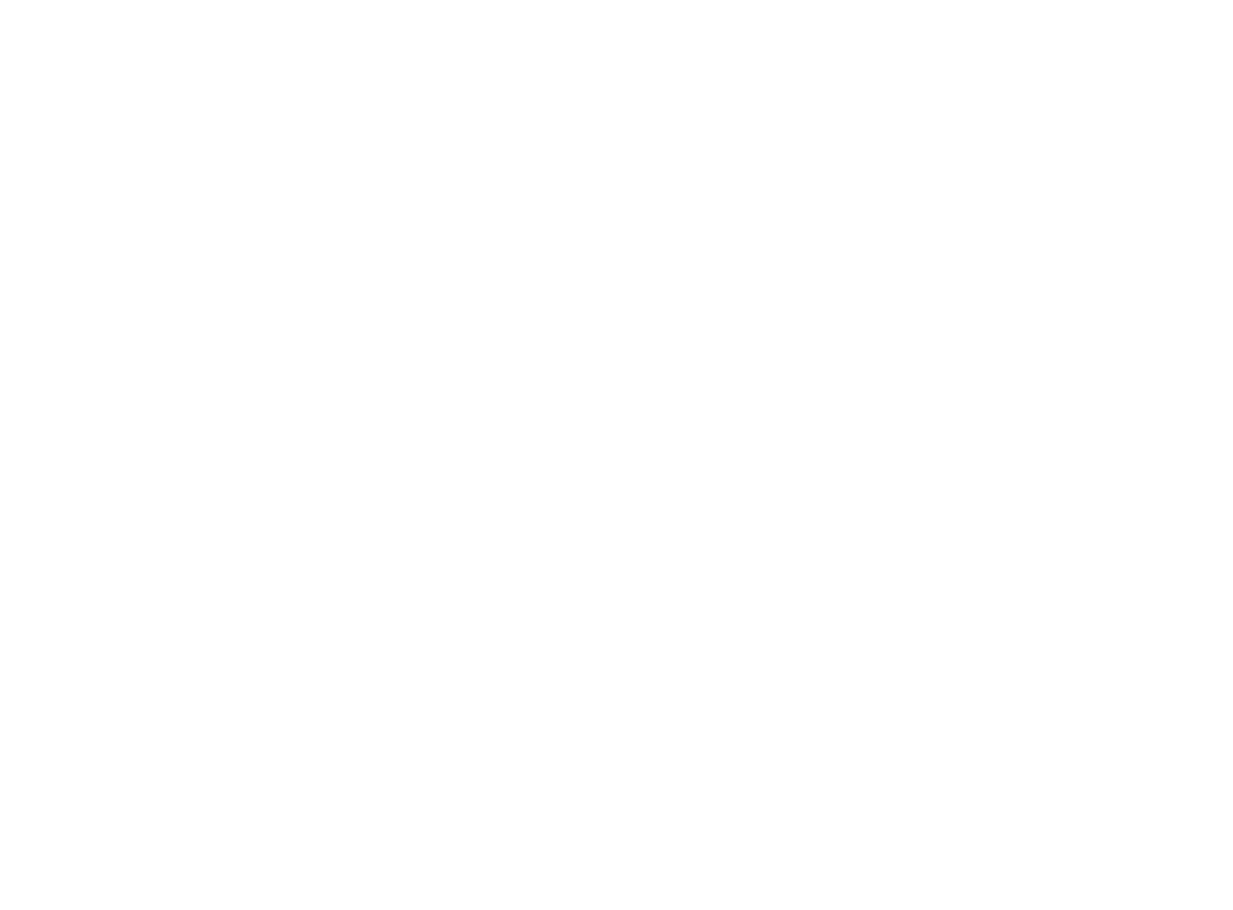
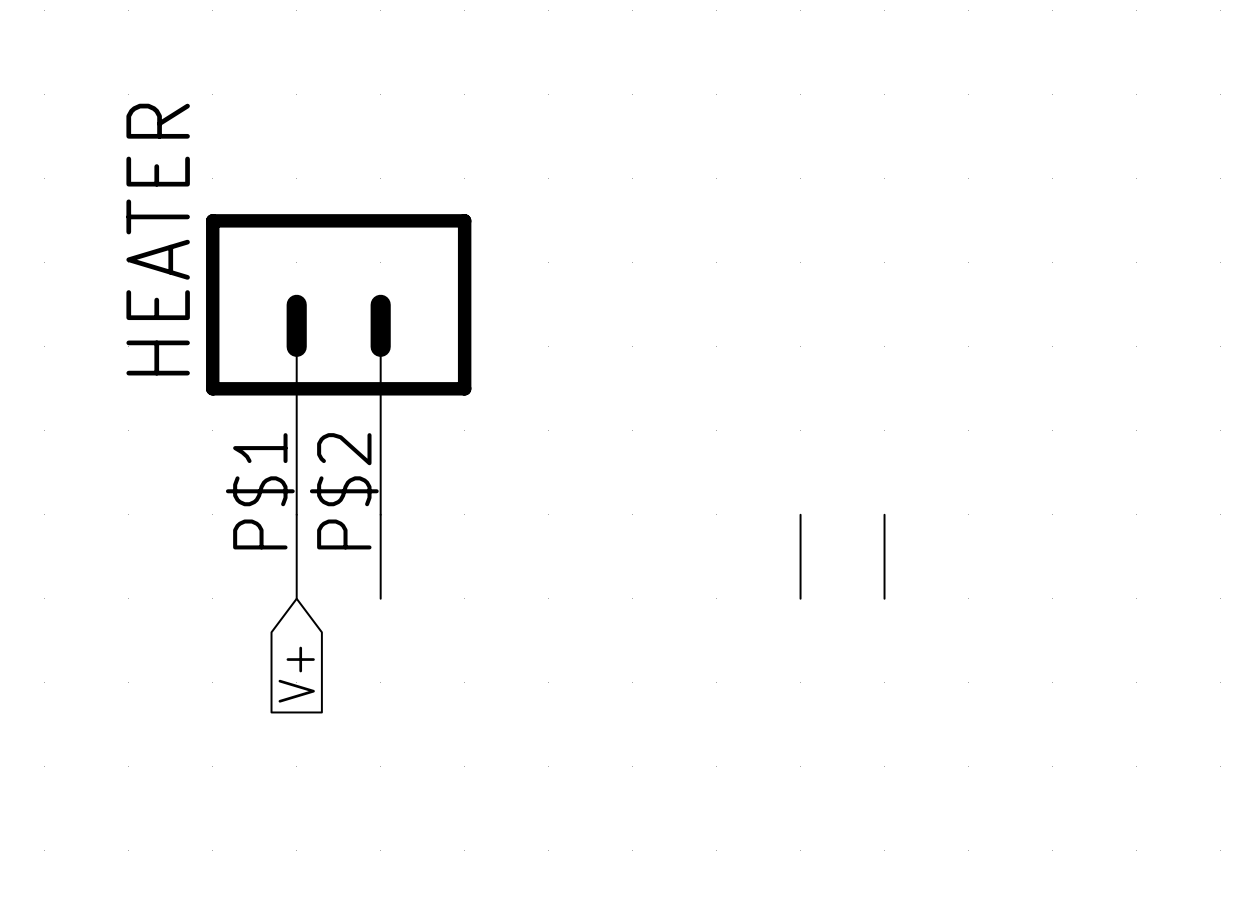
HEATER: none -> (338, 364)
wire: none -> (296, 514) (296, 598)
wire: none -> (380, 514) (380, 598)
wire: none -> (800, 514) (800, 598)
wire: none -> (884, 514) (884, 598)
global label: none -> V+ (296, 674)

